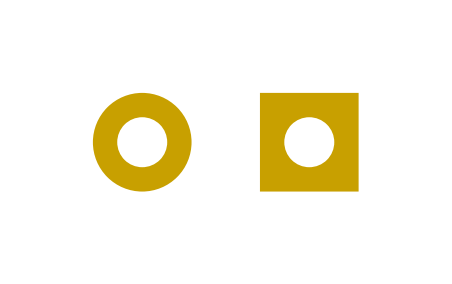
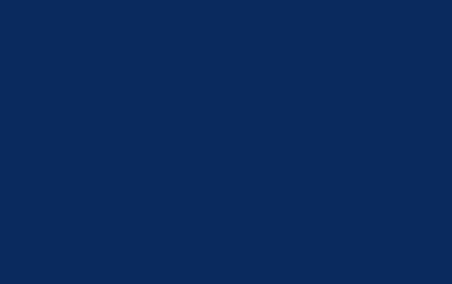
part: (225, 142) -> none

